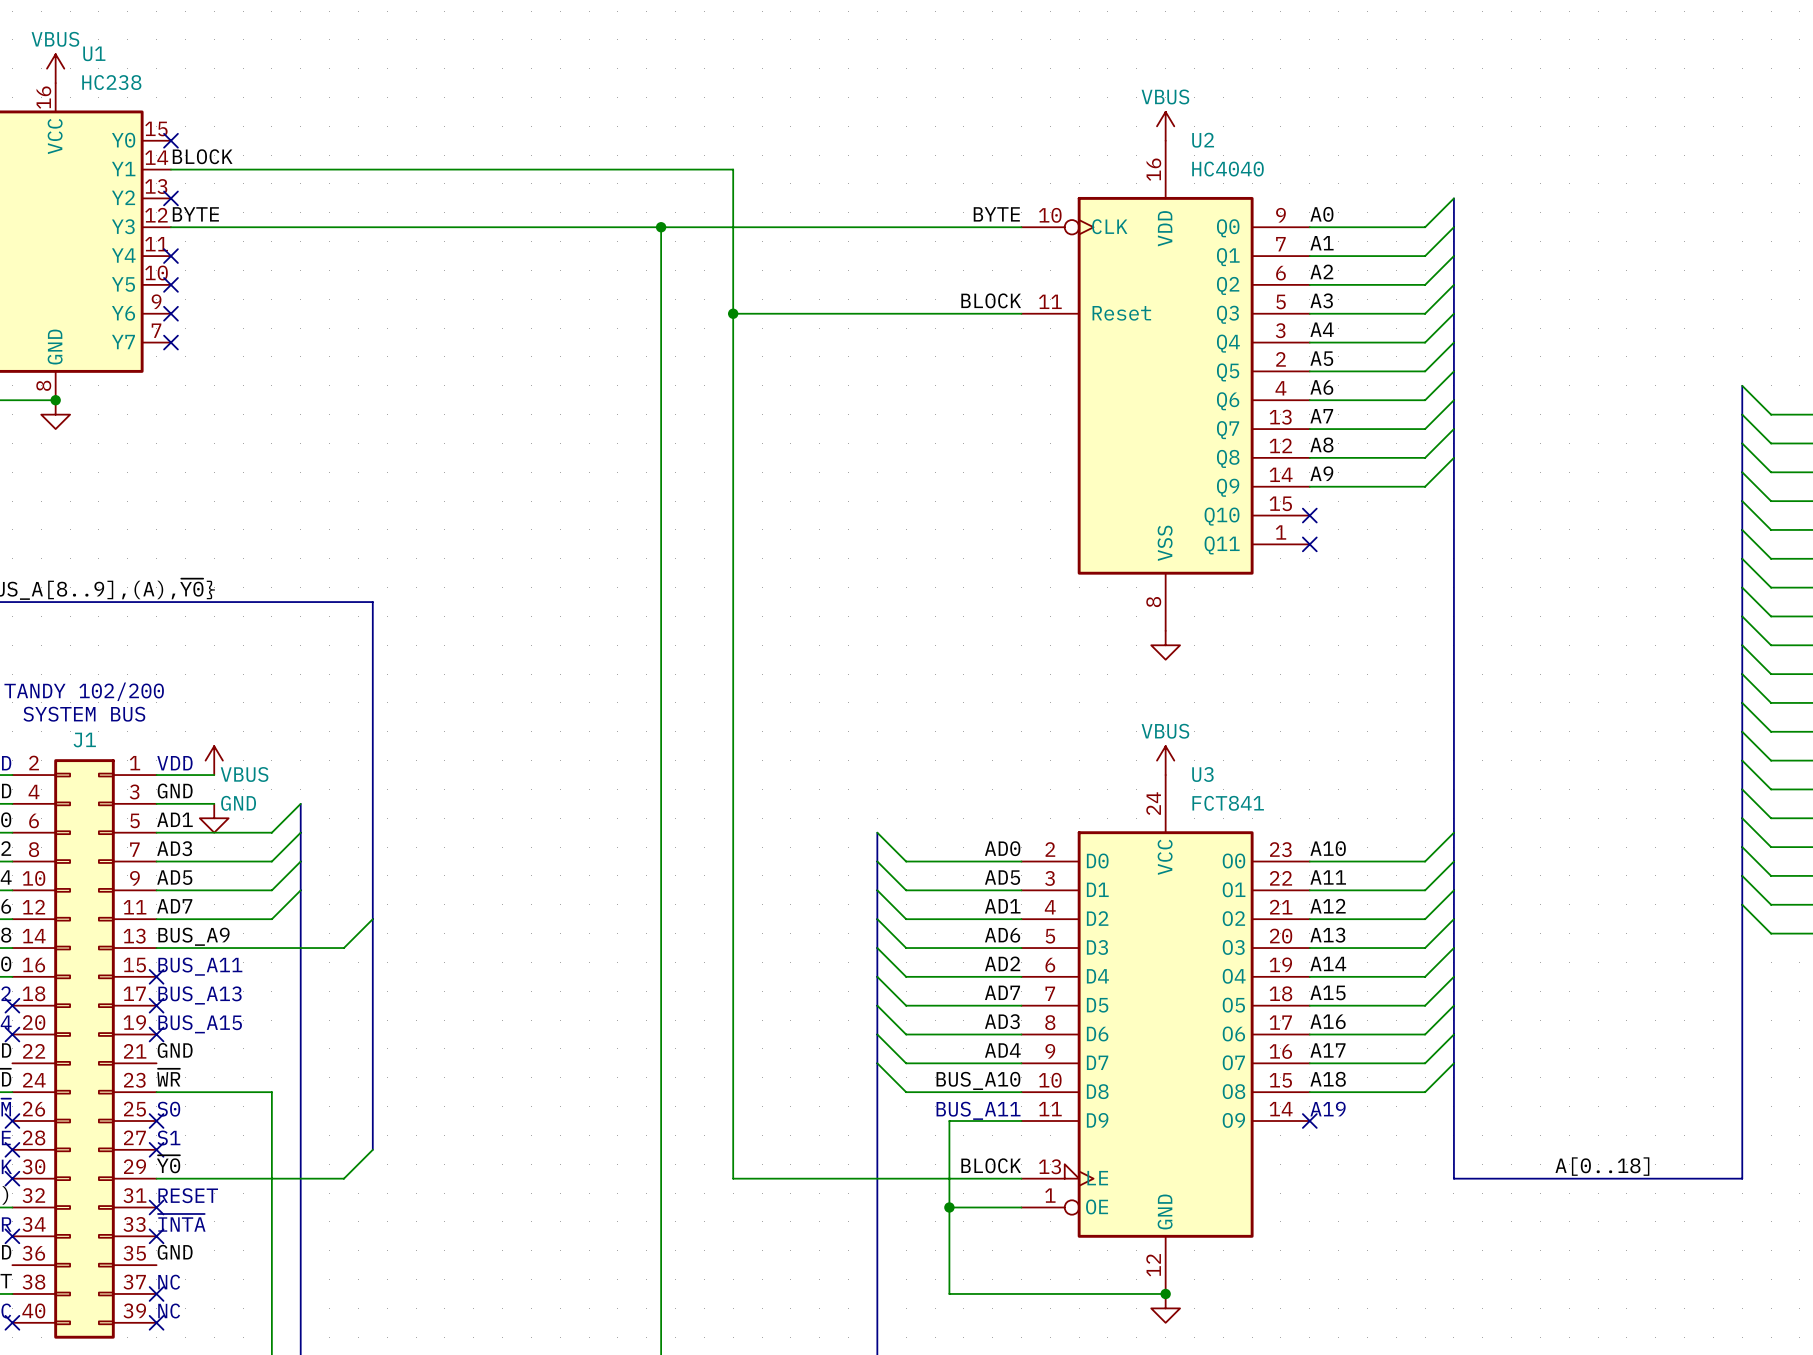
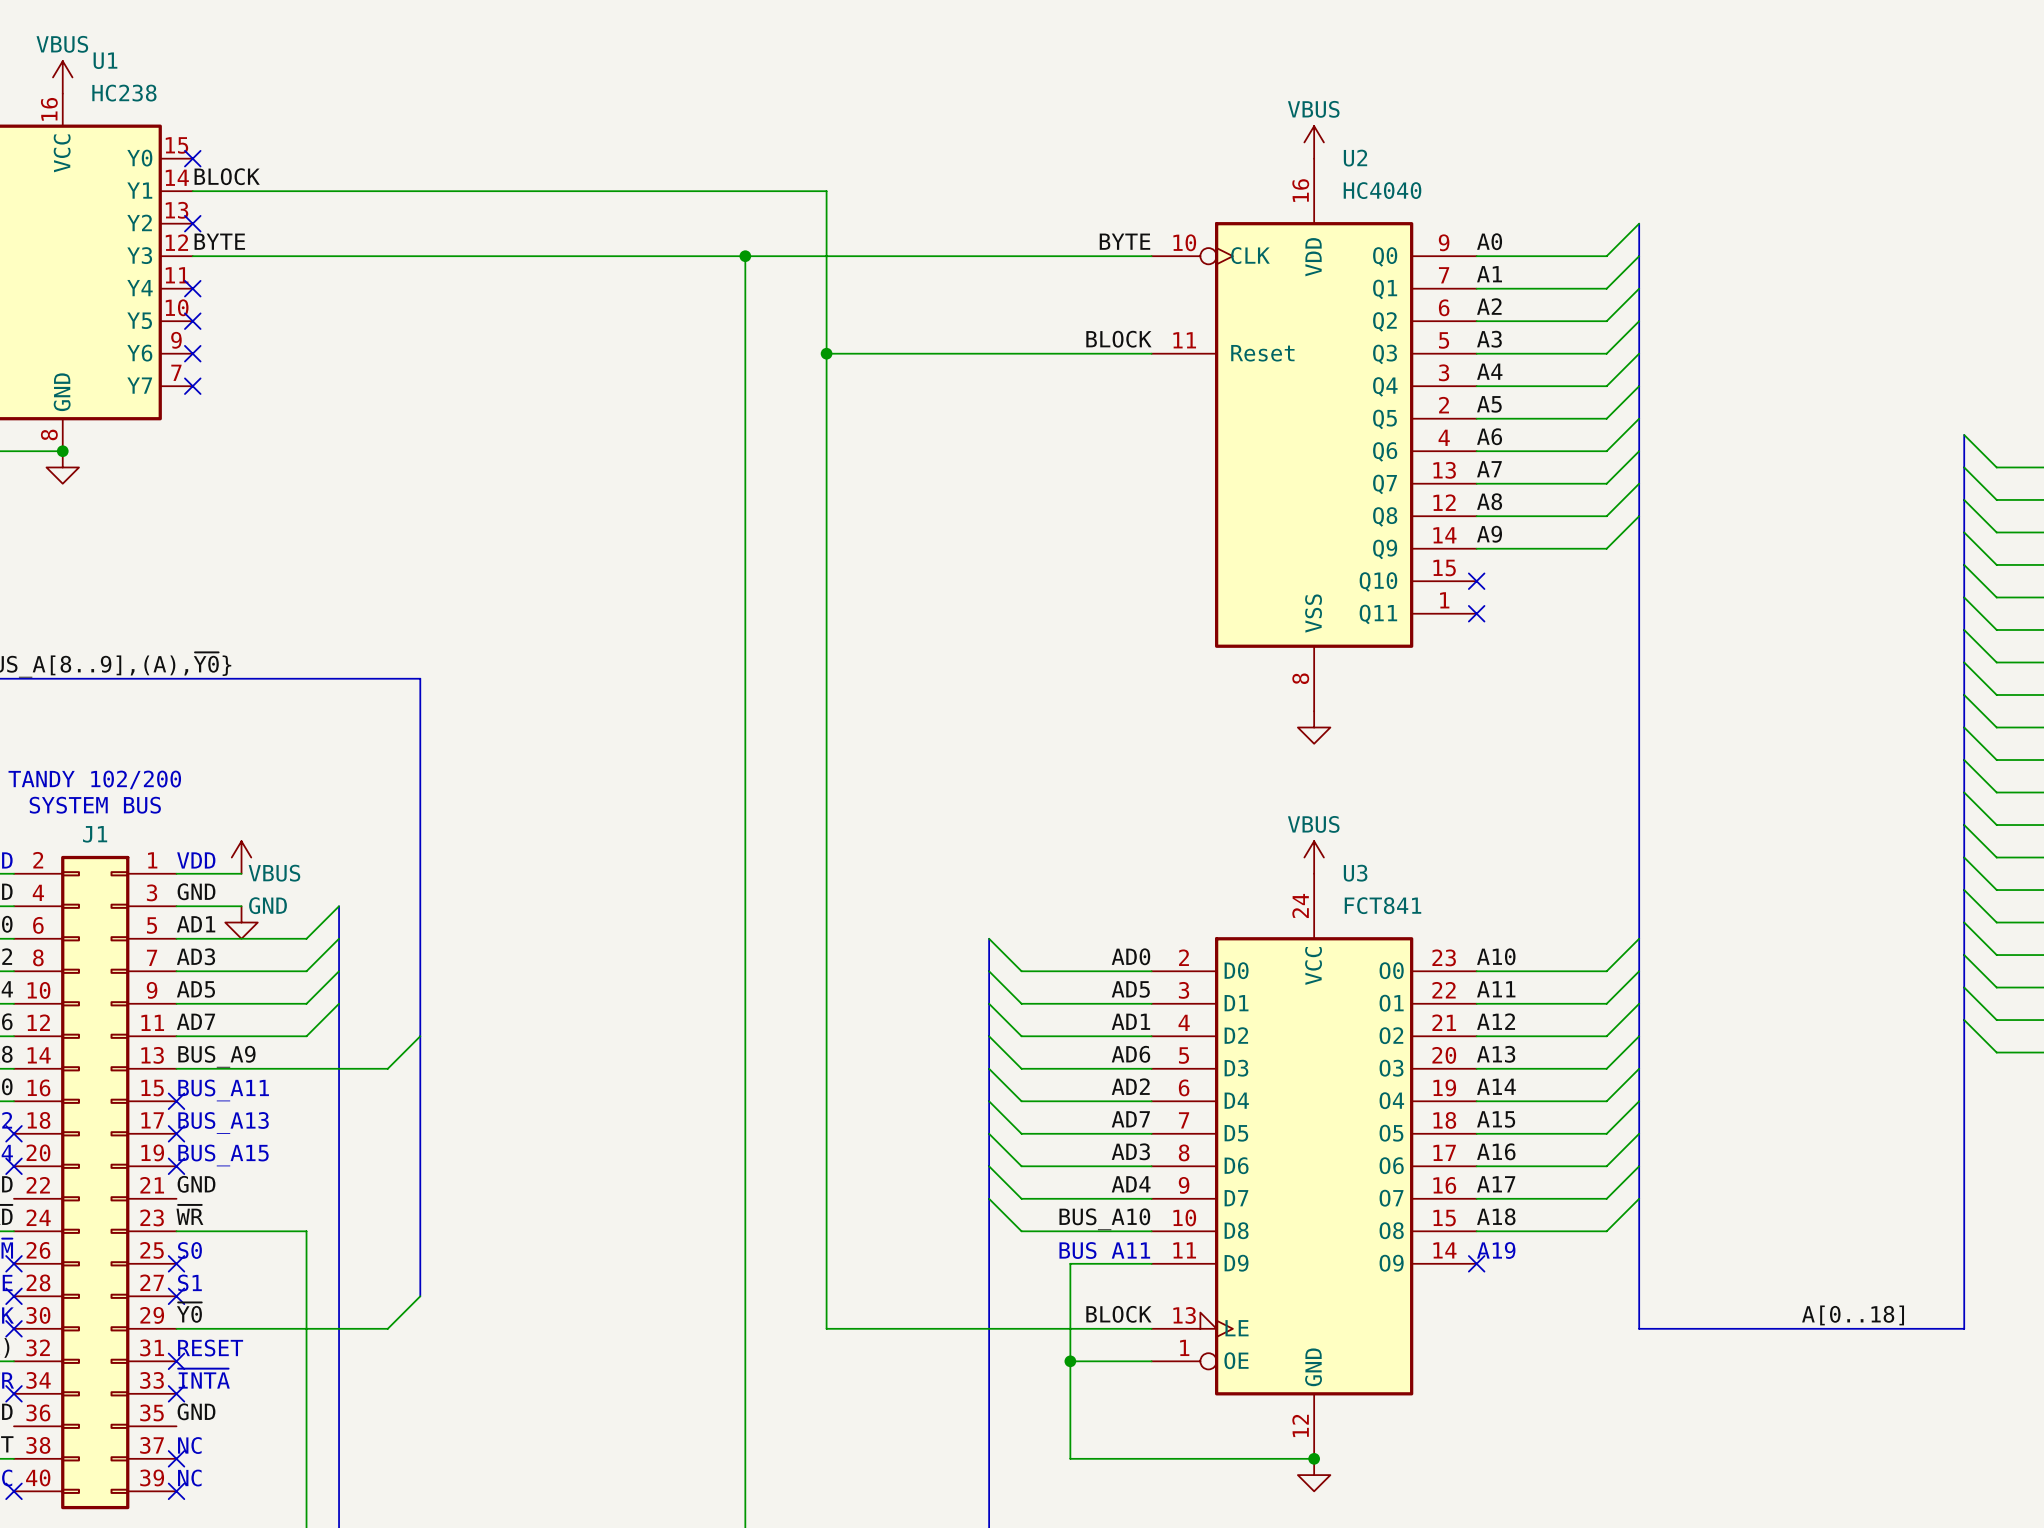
label position: A[0..18] (1602, 1166) -> A[0..18] (1853, 1315)

